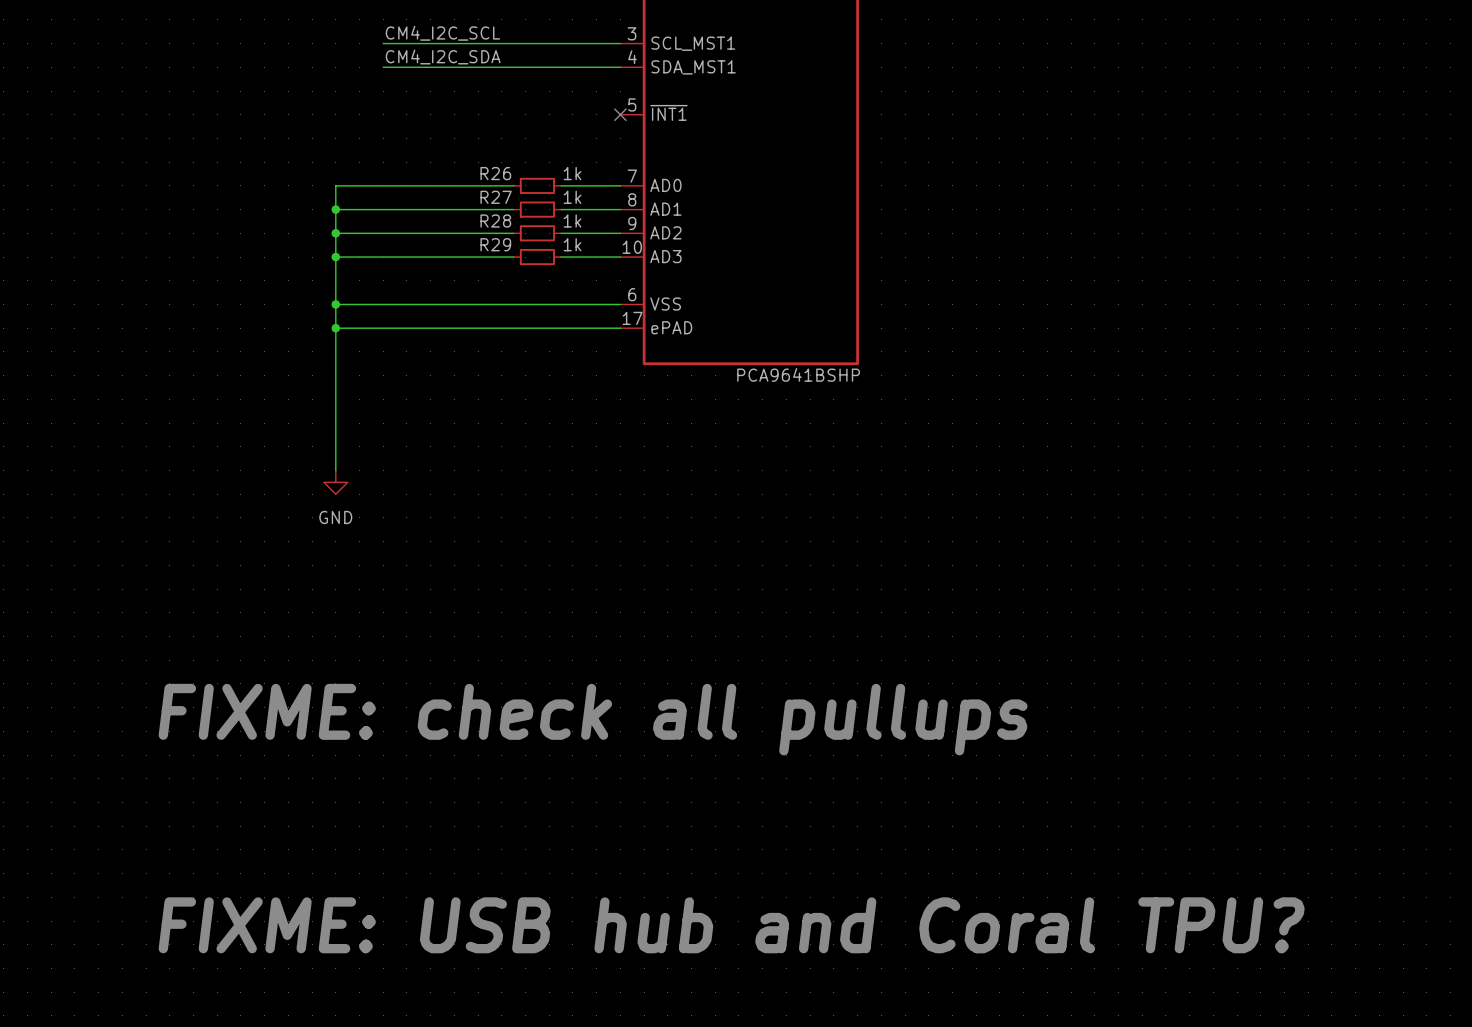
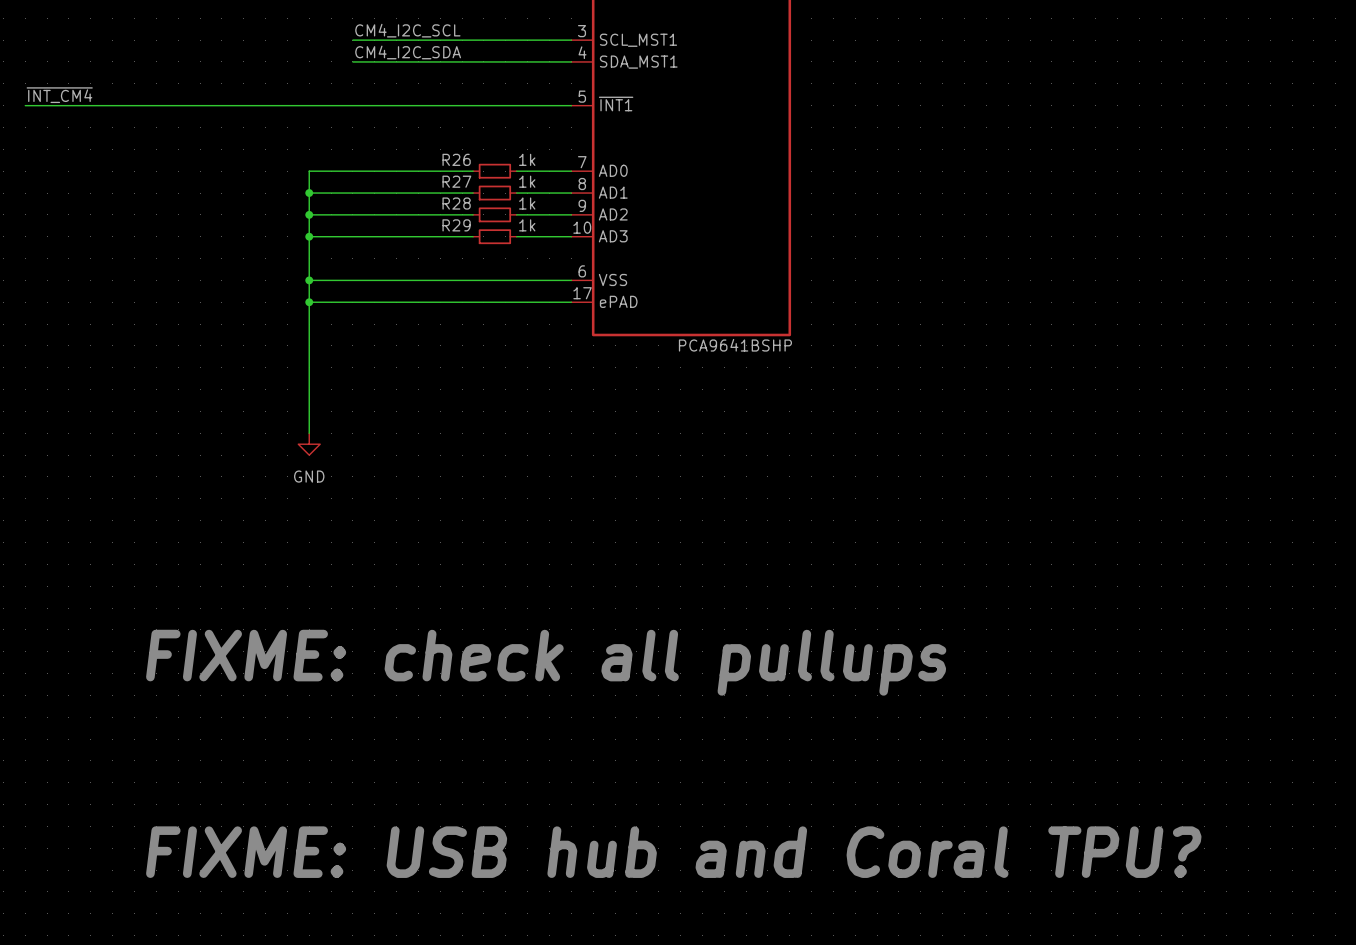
label: none -> ~{INT_CM4} (59, 95)
wire: none -> (25, 105) (571, 105)
no-connect mark: (620, 114) -> none

